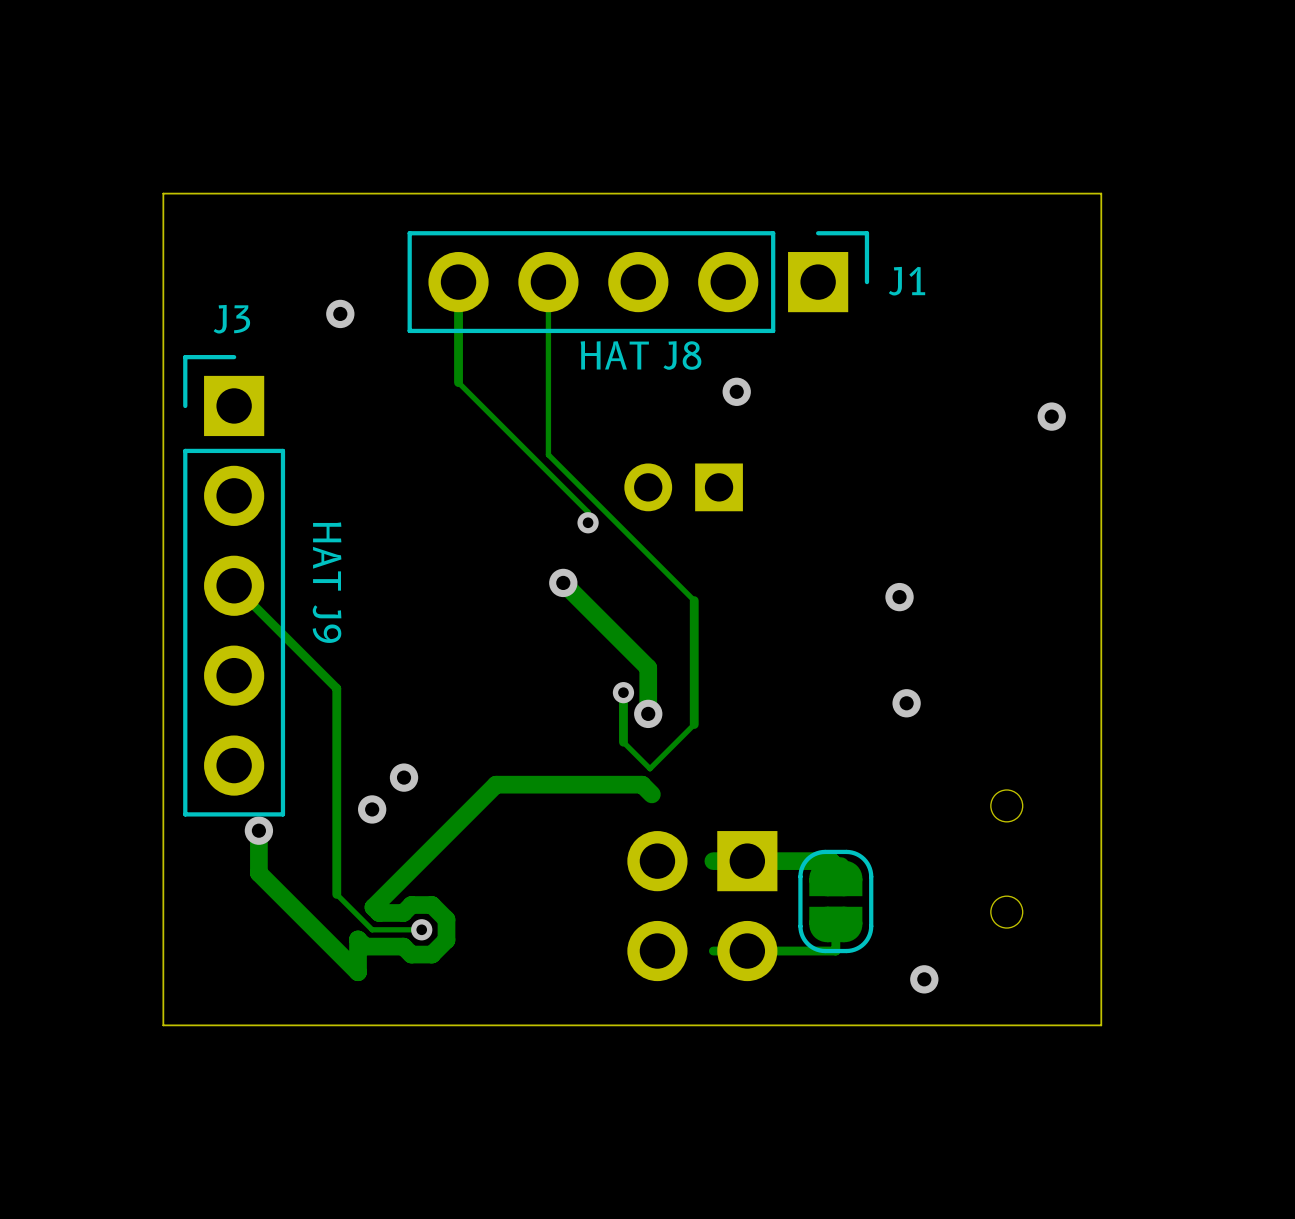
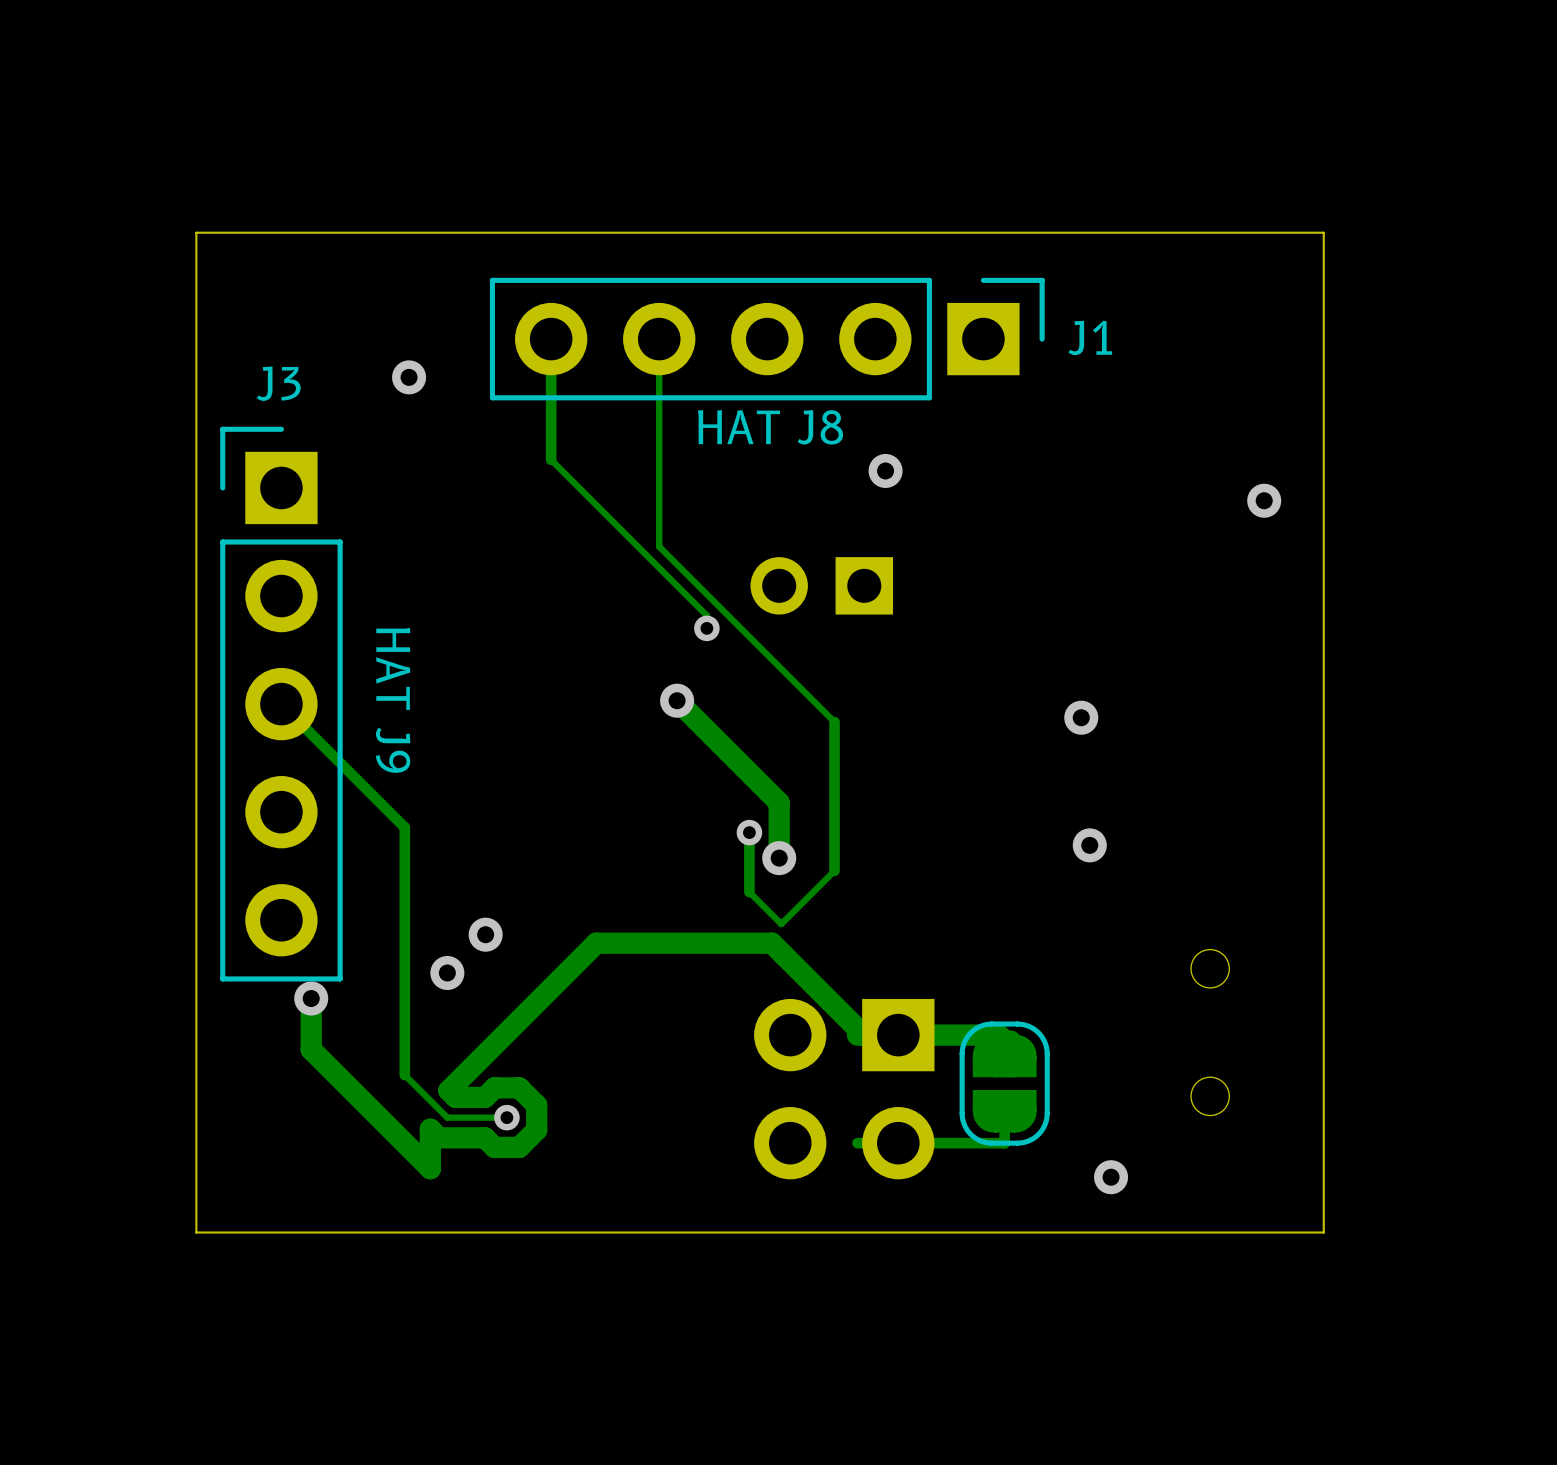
track: none -> (783, 954) (863, 1035)

